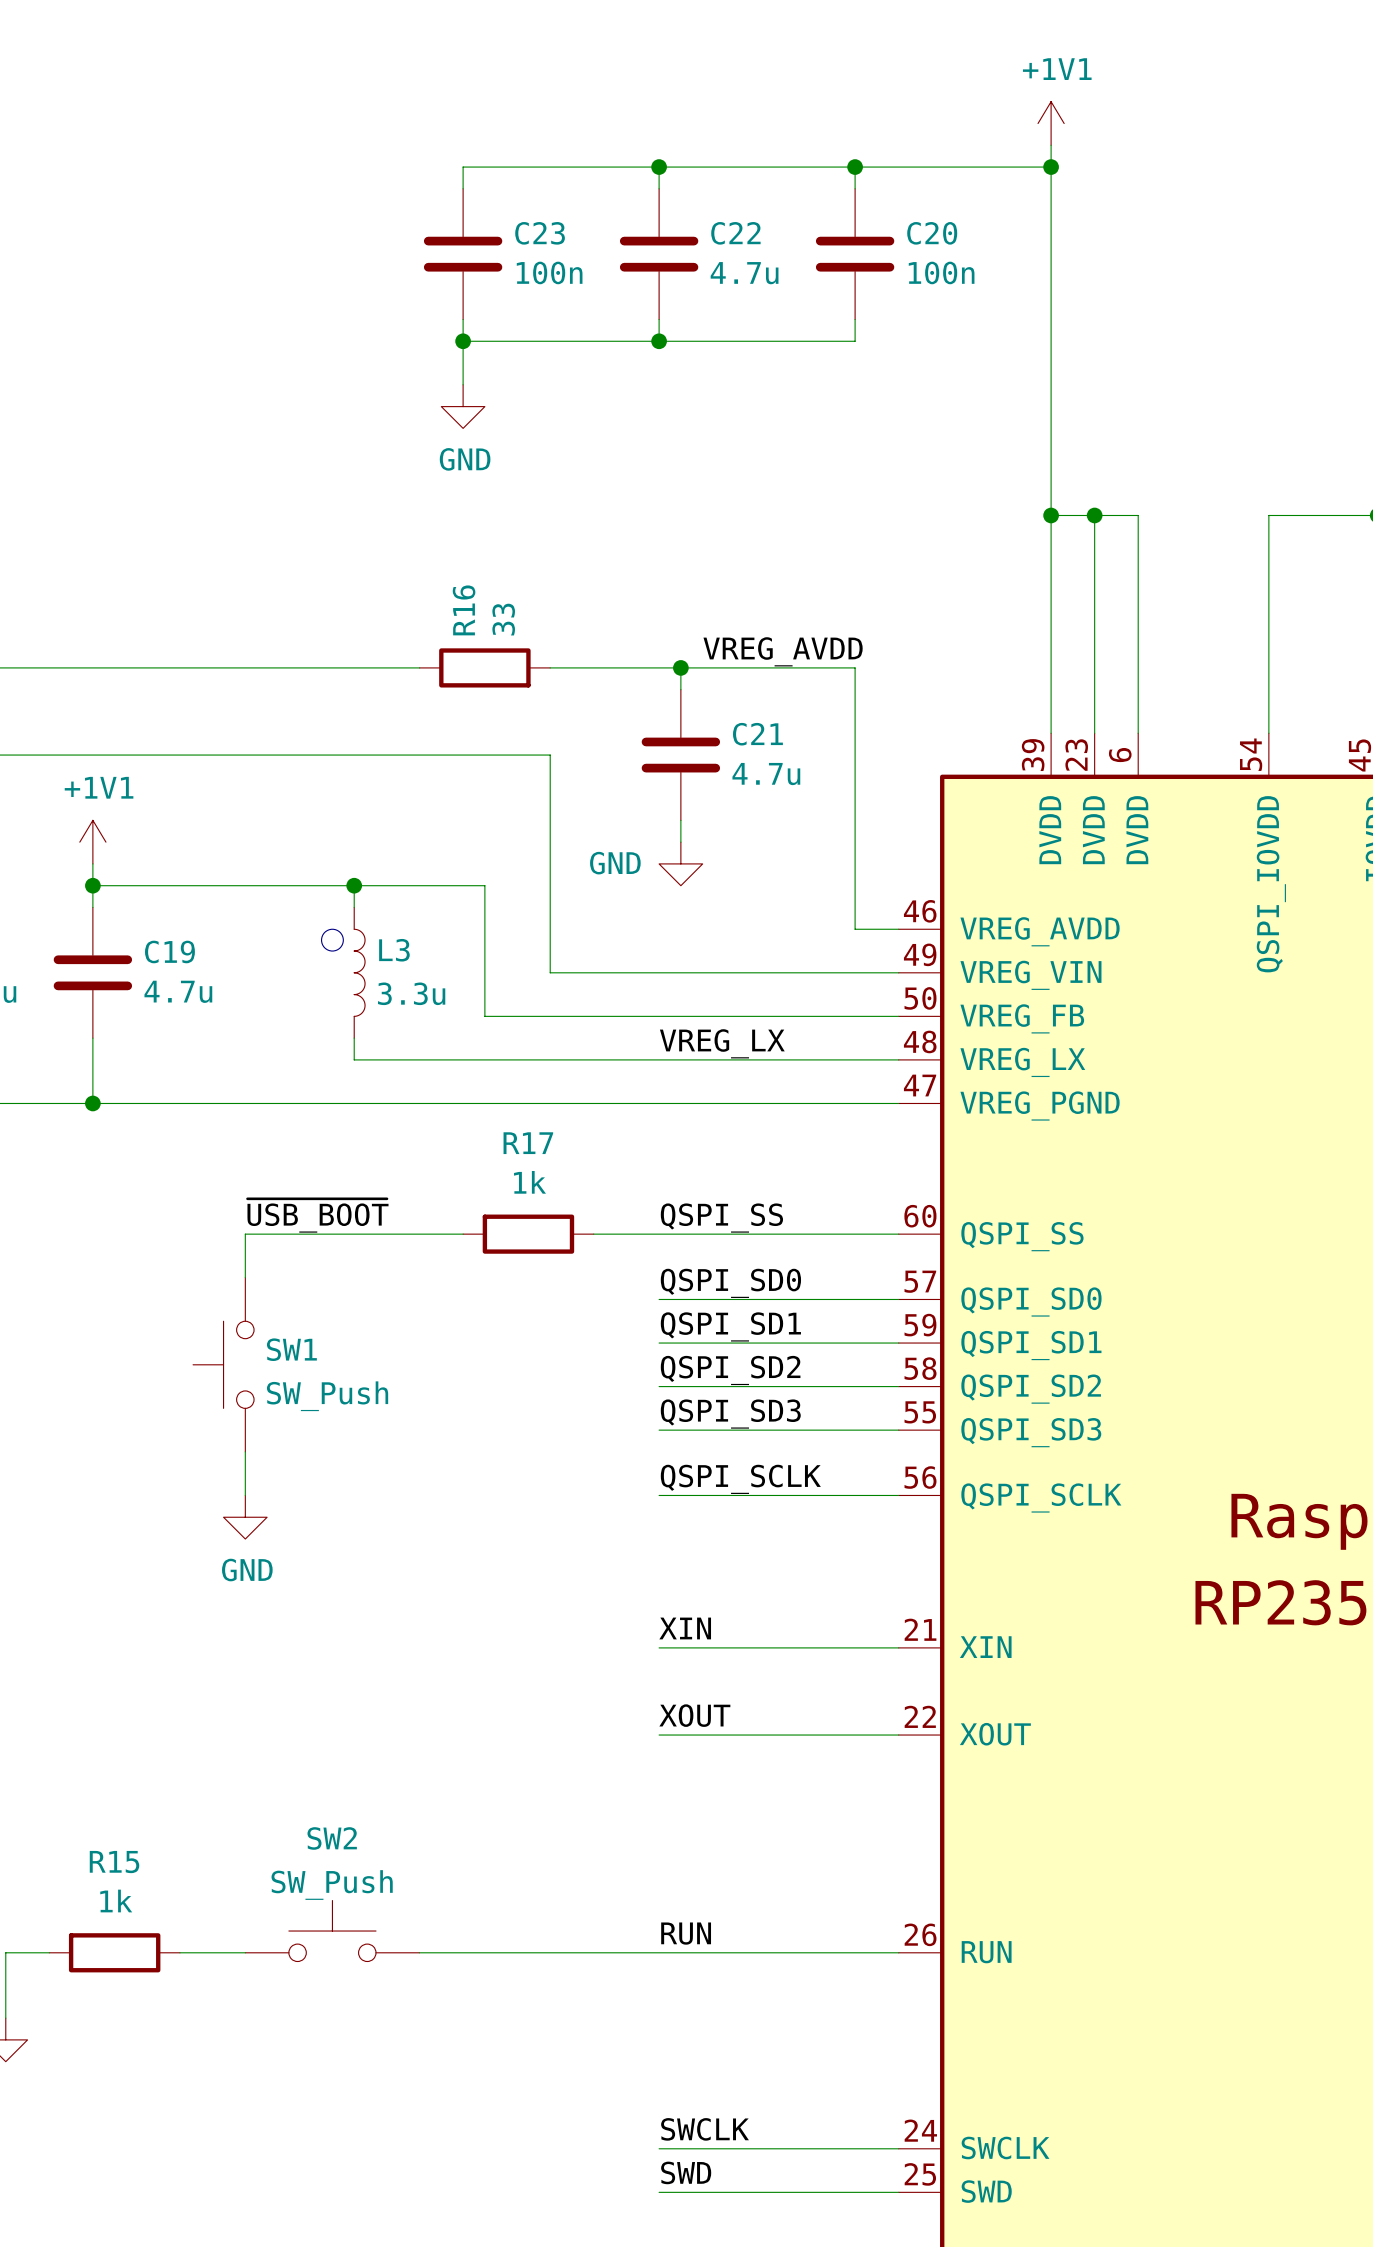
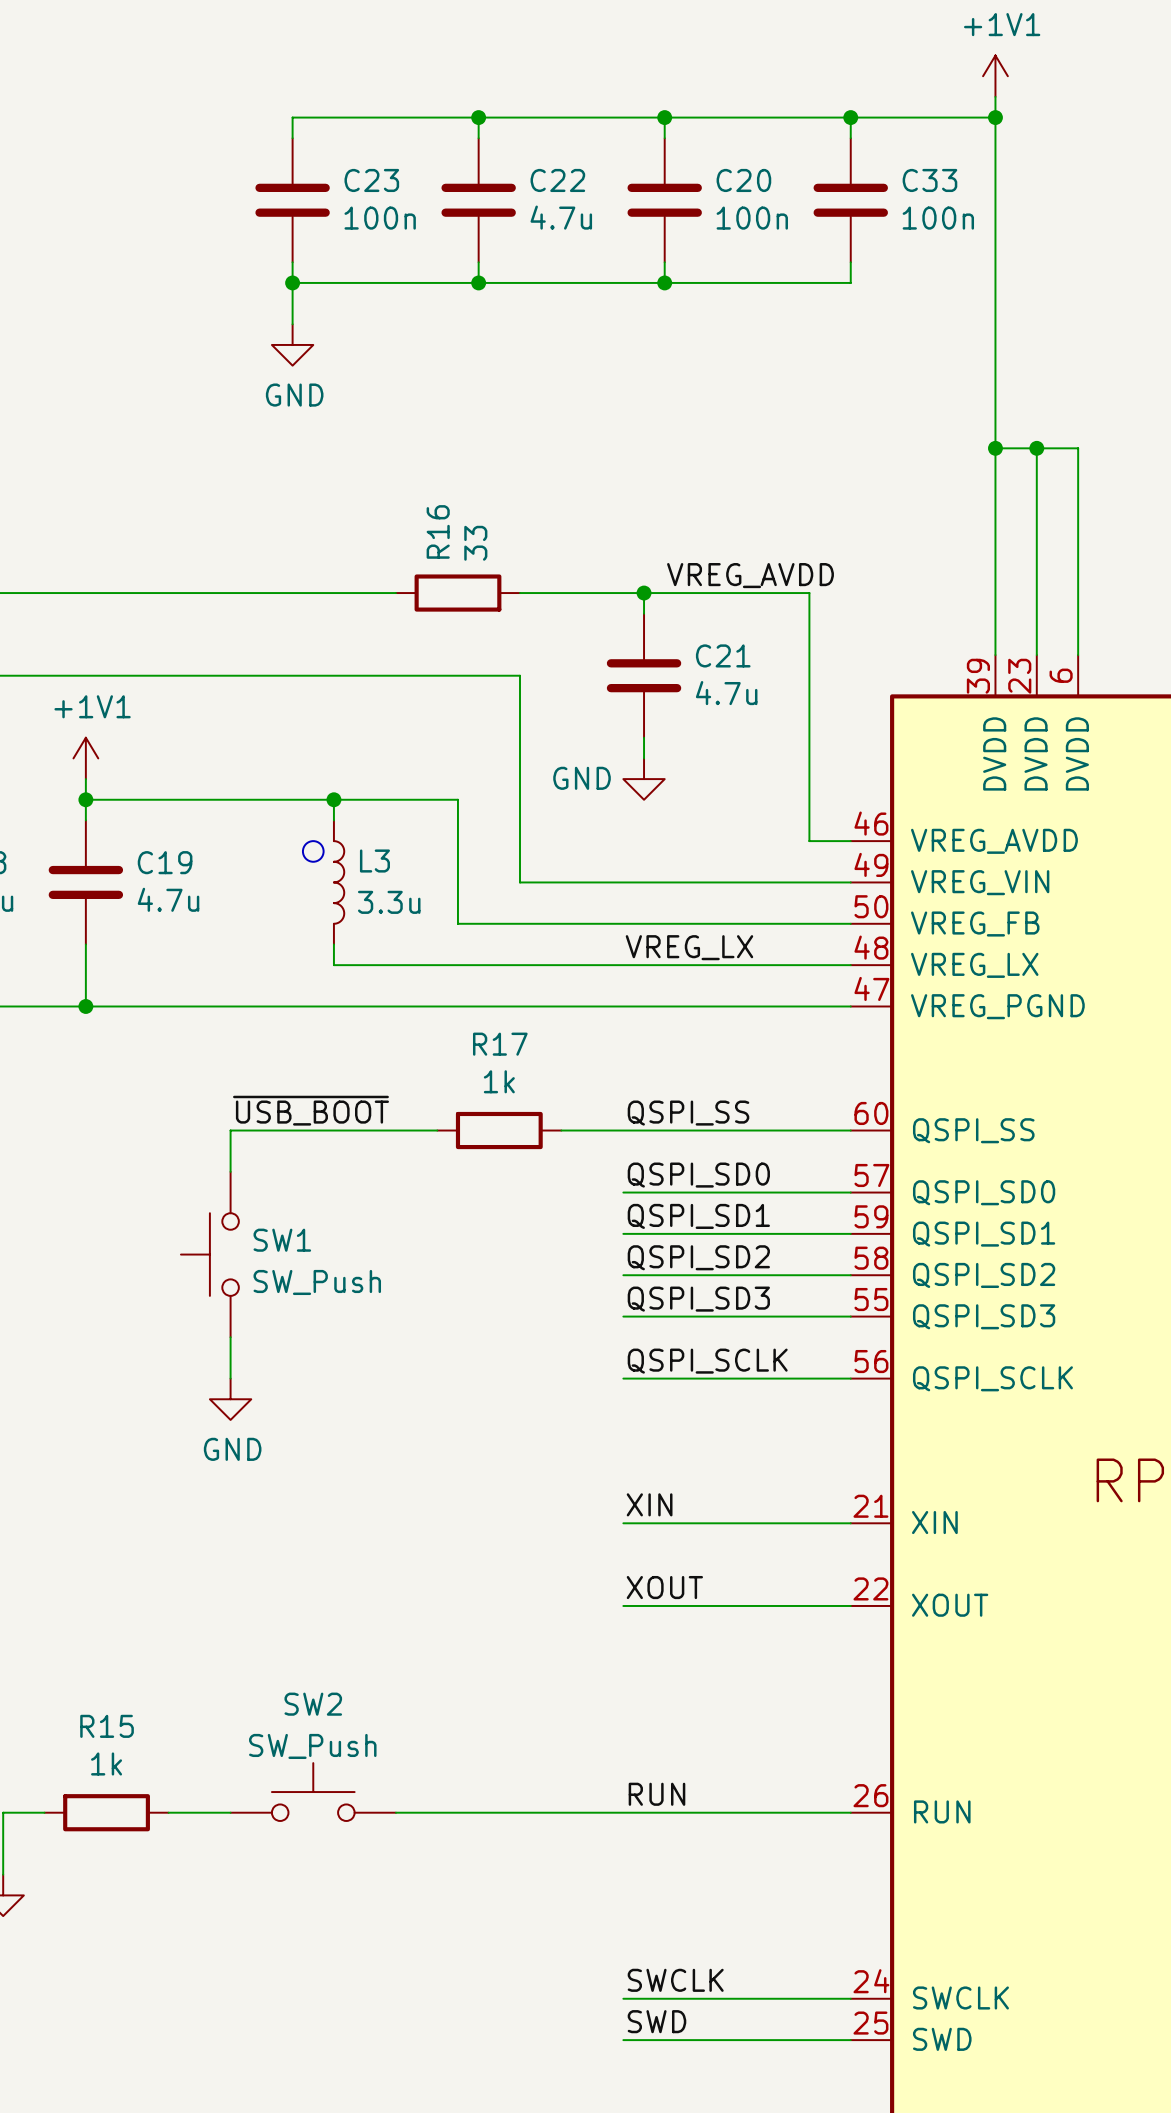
wire: (463, 167) (463, 188) -> (437, 117) (292, 117) (292, 138)
junction: none -> (478, 117)
wire: (659, 167) (659, 188) -> (478, 117) (478, 138)
junction position: (659, 167) -> (664, 117)
wire: (855, 167) (855, 188) -> (664, 117) (664, 138)
junction position: (855, 167) -> (850, 117)
wire: none -> (850, 117) (850, 138)
C23 position: (463, 254) -> (292, 200)
C22 position: (659, 254) -> (478, 200)
C20 position: (855, 254) -> (664, 200)
C33: none -> 100n (850, 200)
wire: (463, 319) (463, 384) -> (292, 262) (292, 324)
wire: (659, 319) (659, 341) -> (478, 262) (478, 282)
wire: none -> (664, 262) (664, 282)
wire: (855, 319) (855, 341) -> (850, 262) (850, 282) (809, 282)
wire: none -> (292, 282) (437, 282)
junction: none -> (292, 282)
junction position: (463, 341) -> (478, 282)
junction position: (659, 341) -> (664, 282)
power symbol position: GND (463, 406) -> GND (292, 344)

